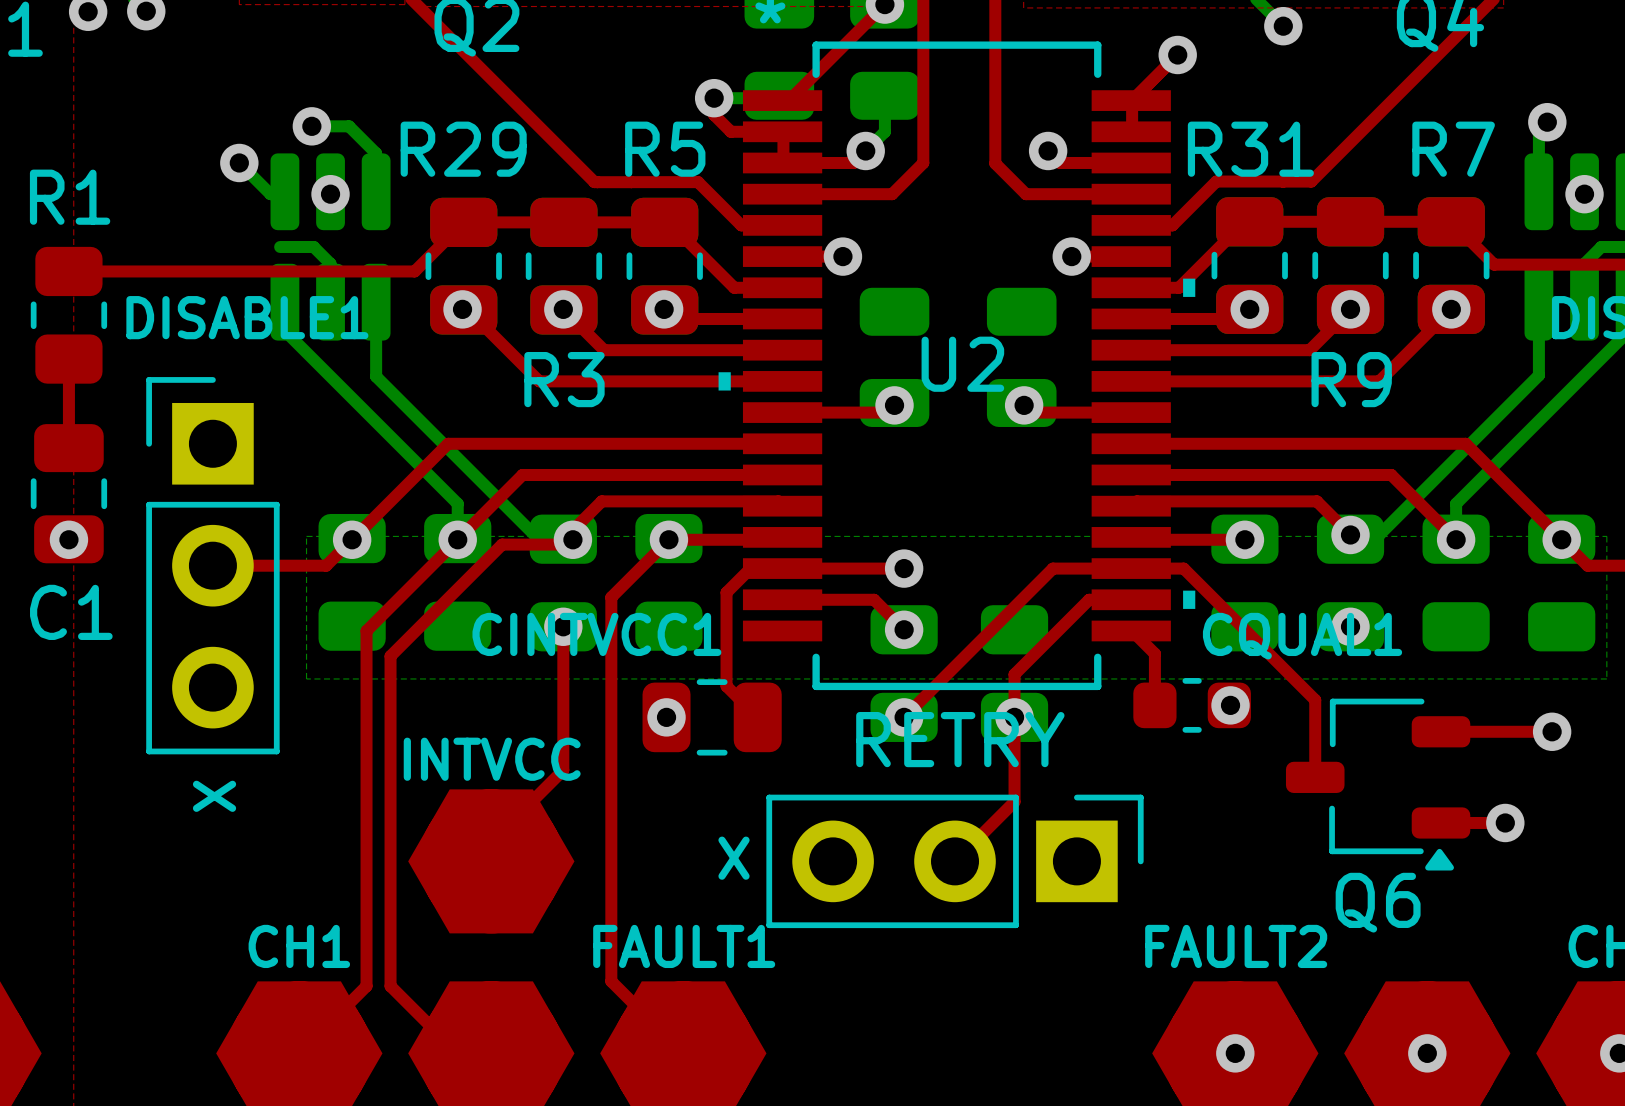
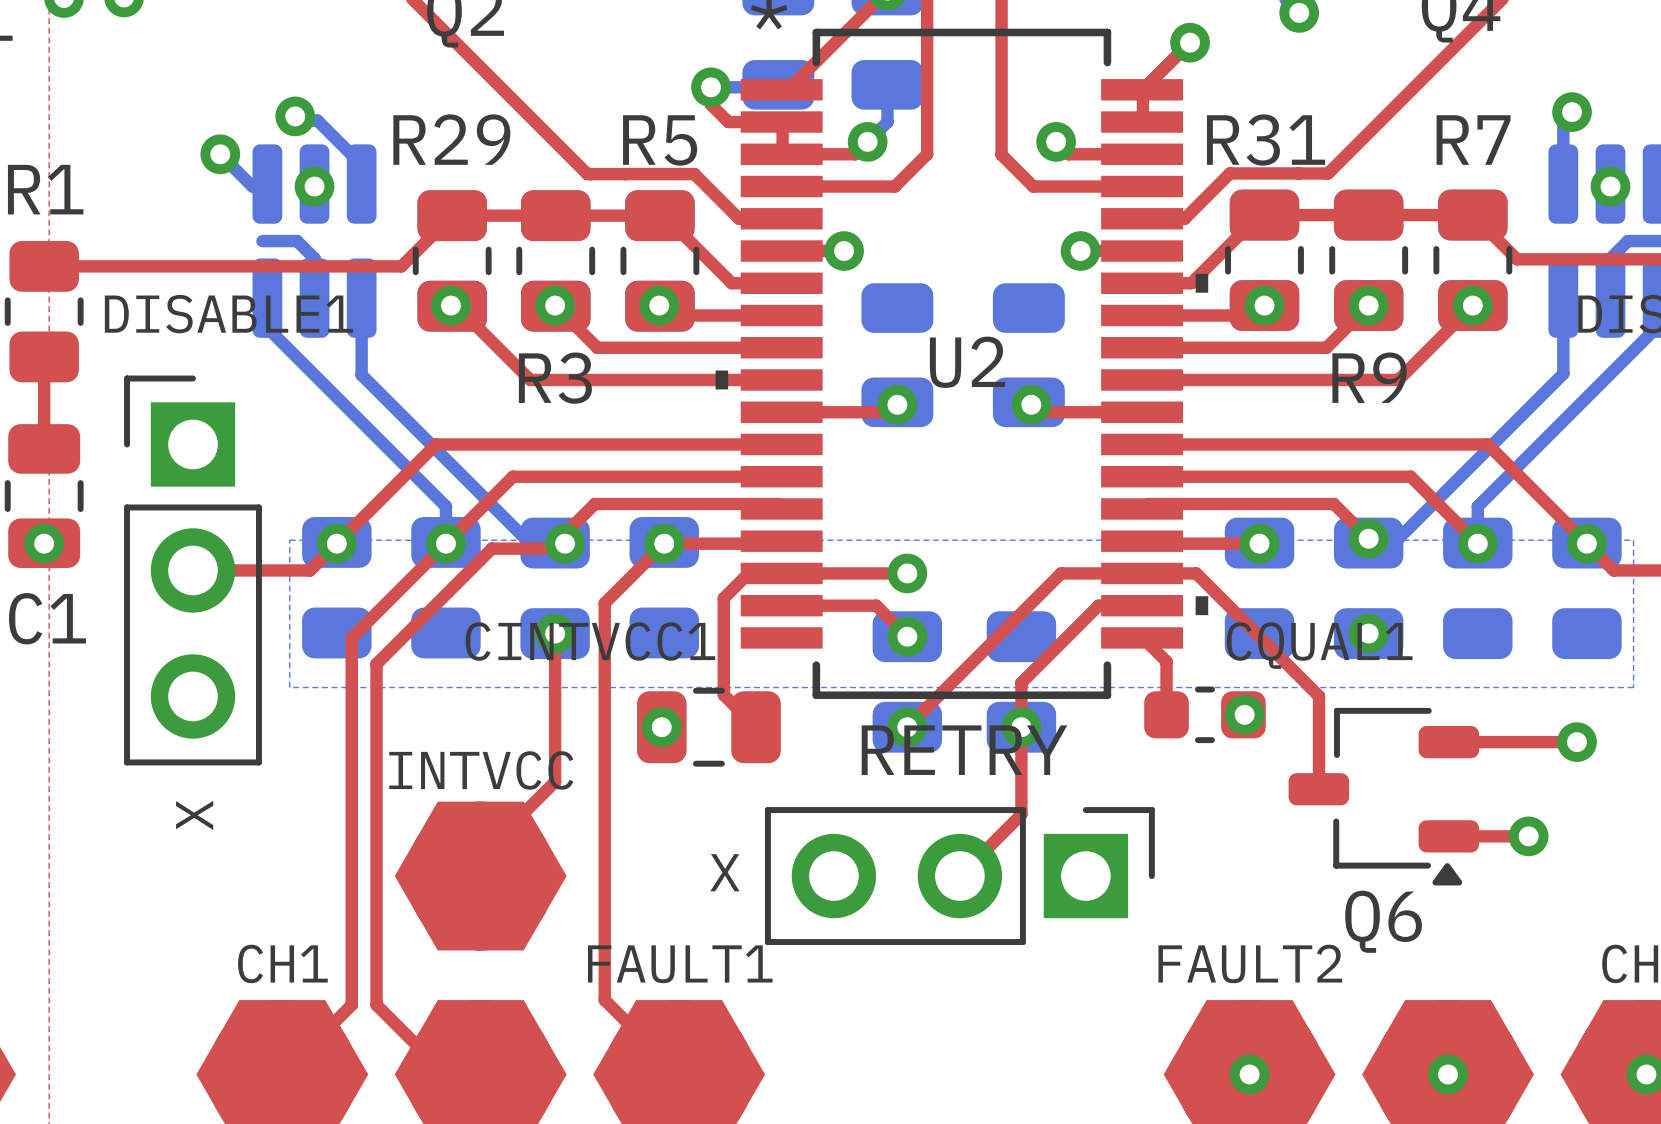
bottom track: (311, 126) (349, 126) (376, 153) (376, 173) -> (299, 120) (317, 120) (361, 164)
top track: (1302, 687) (1315, 700) (1315, 777) -> (1319, 696) (1319, 789)
Q6 position: (1378, 784) -> (1383, 796)

